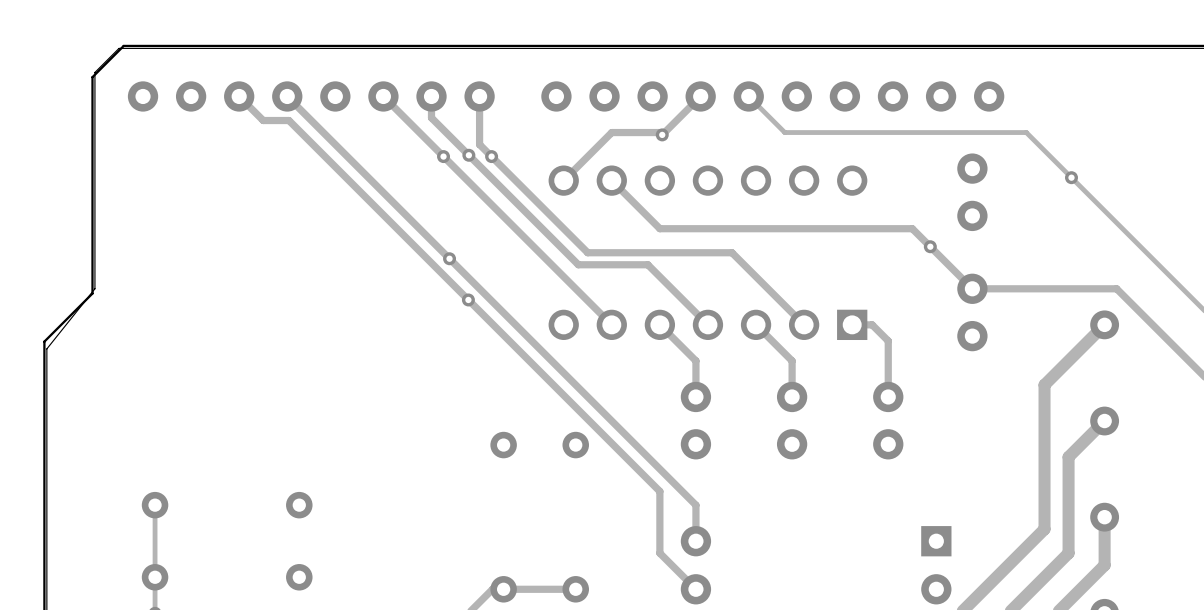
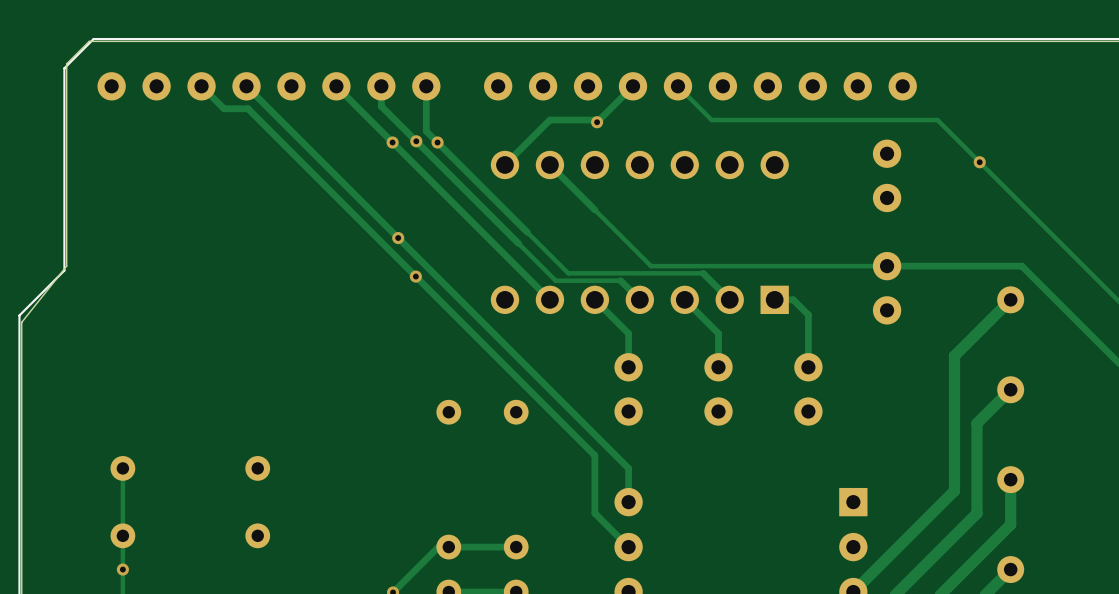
track: (659, 228) (912, 228) (972, 288) -> (594, 209) (651, 266) (887, 266)
via: (930, 246) -> none
track: (587, 252) (732, 252) (775, 296) -> (527, 232) (568, 273) (703, 273)
track: (578, 264) (647, 264) (687, 304) -> (518, 243) (555, 280) (620, 280)

